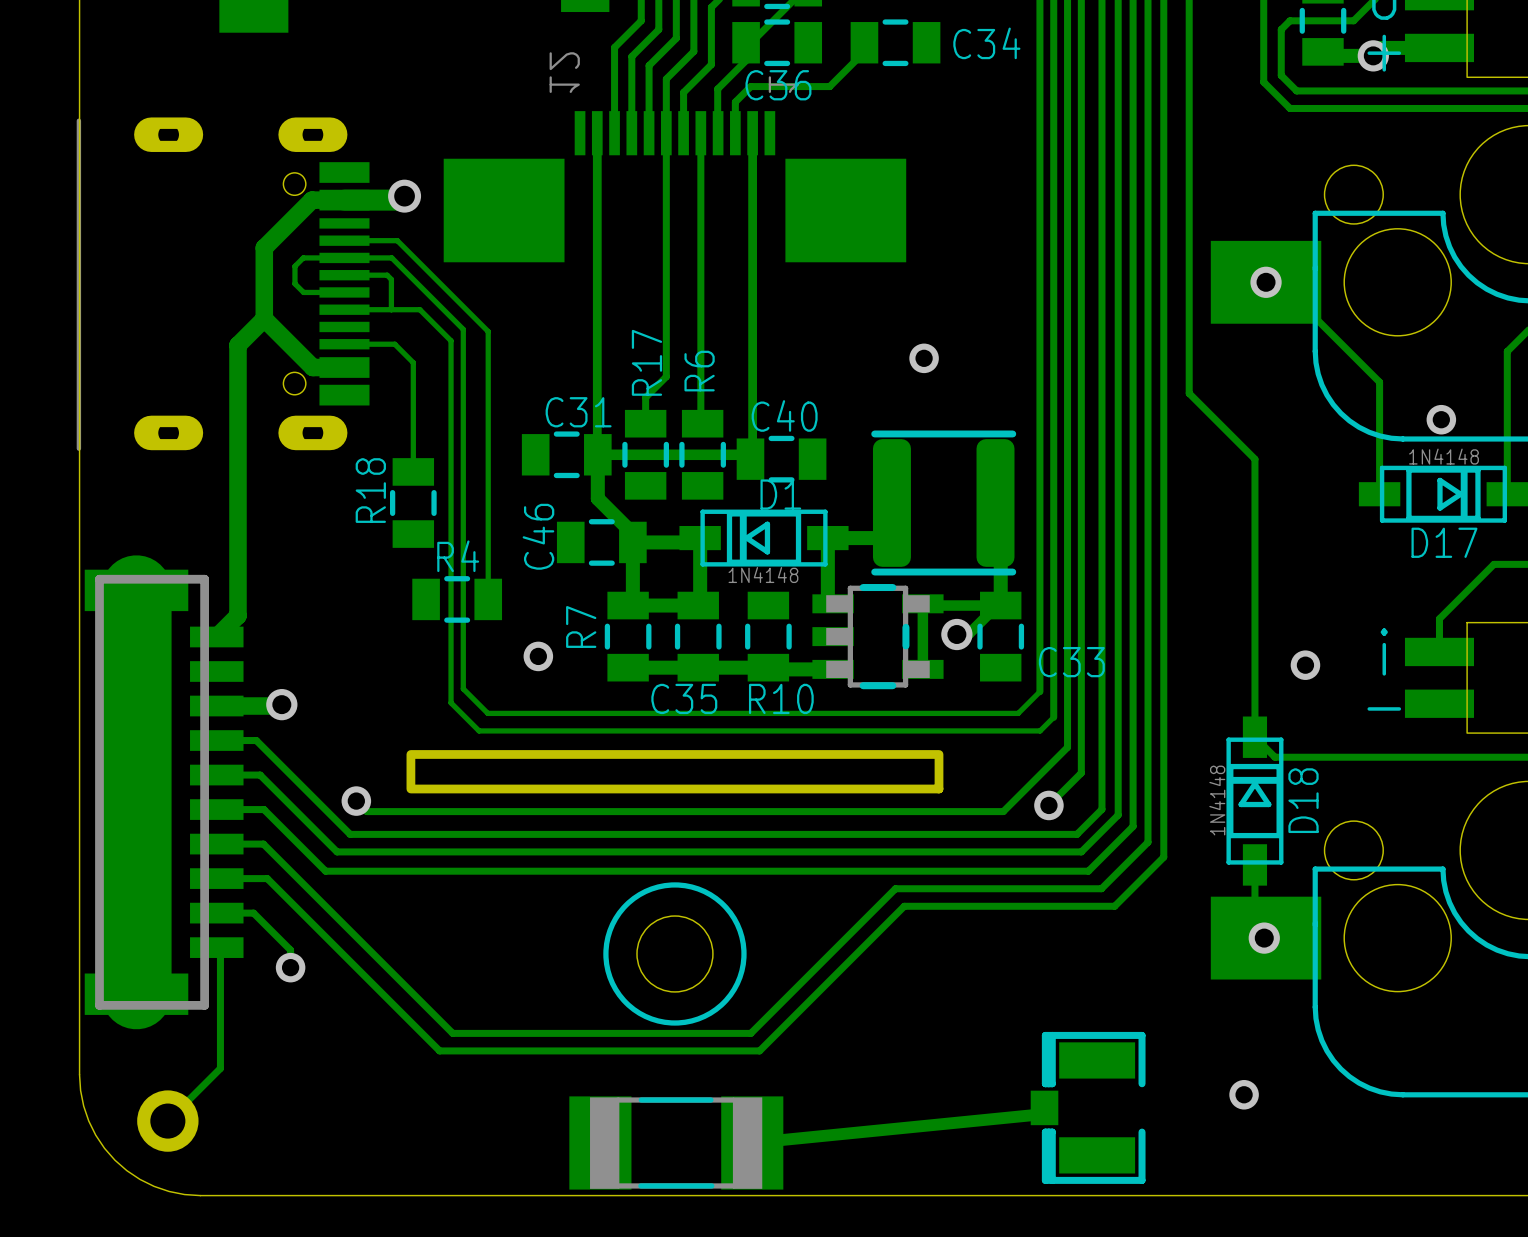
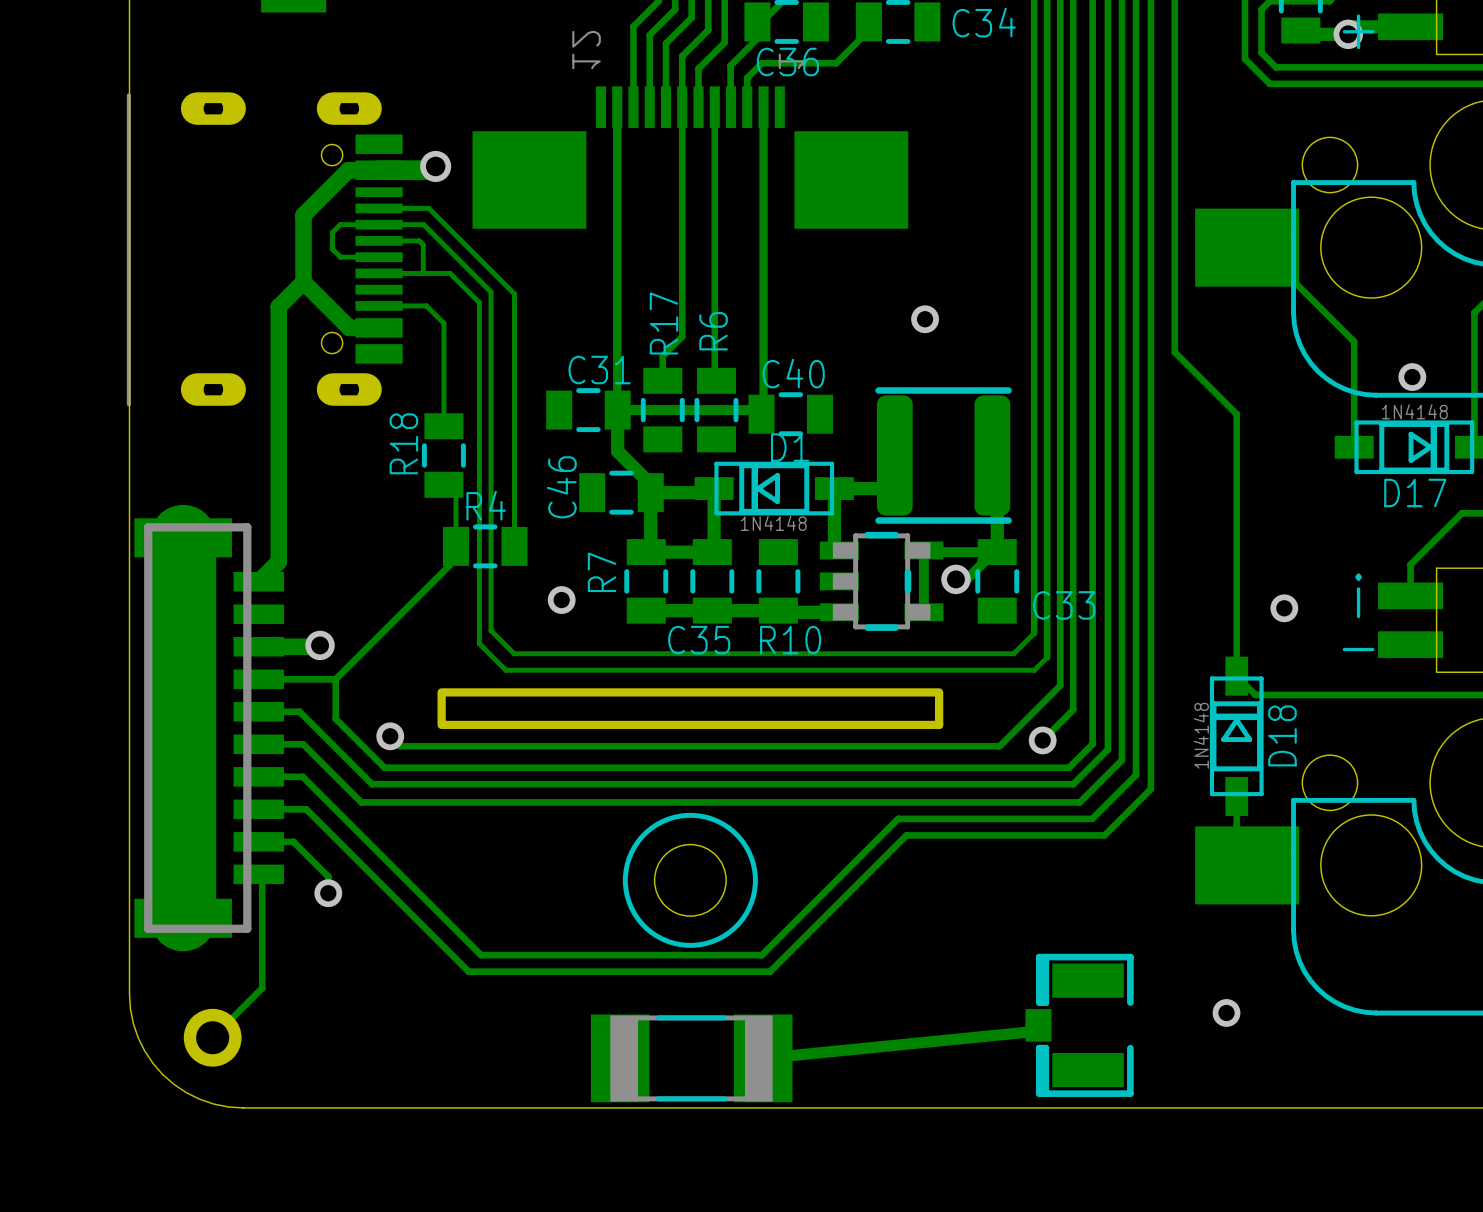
via: (1266, 282) -> none
track: none -> (443, 484) (455, 496) (455, 559) (335, 679)
track: (256, 740) (298, 782) -> (335, 679) (335, 719)
track: none -> (335, 679) (296, 679)
via: (1264, 938) -> none

